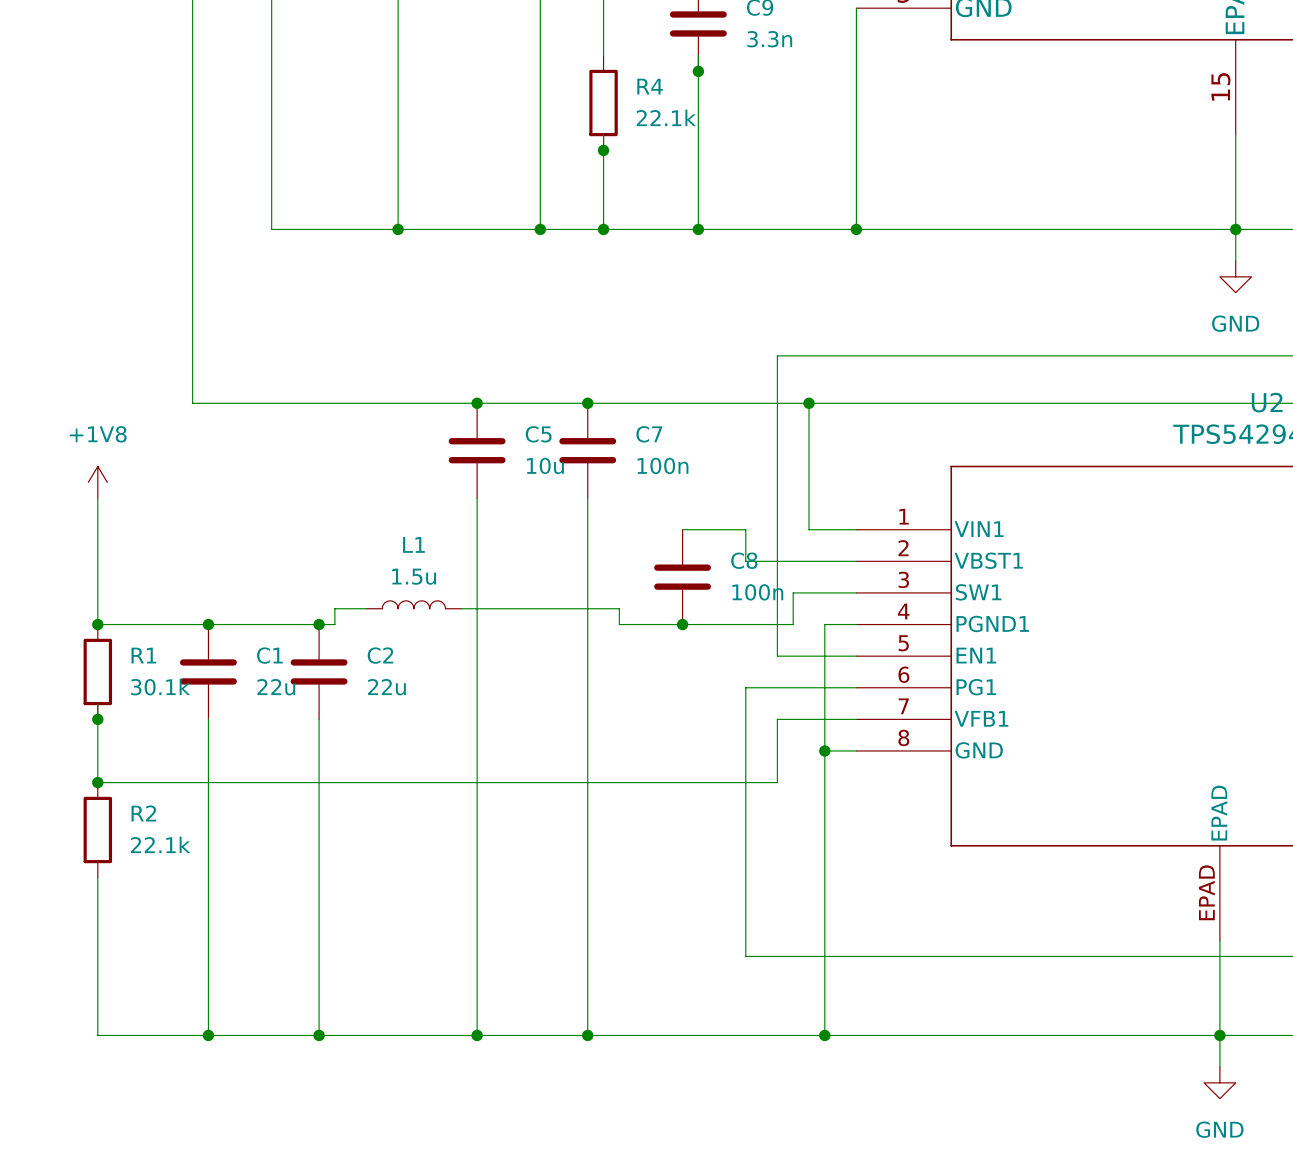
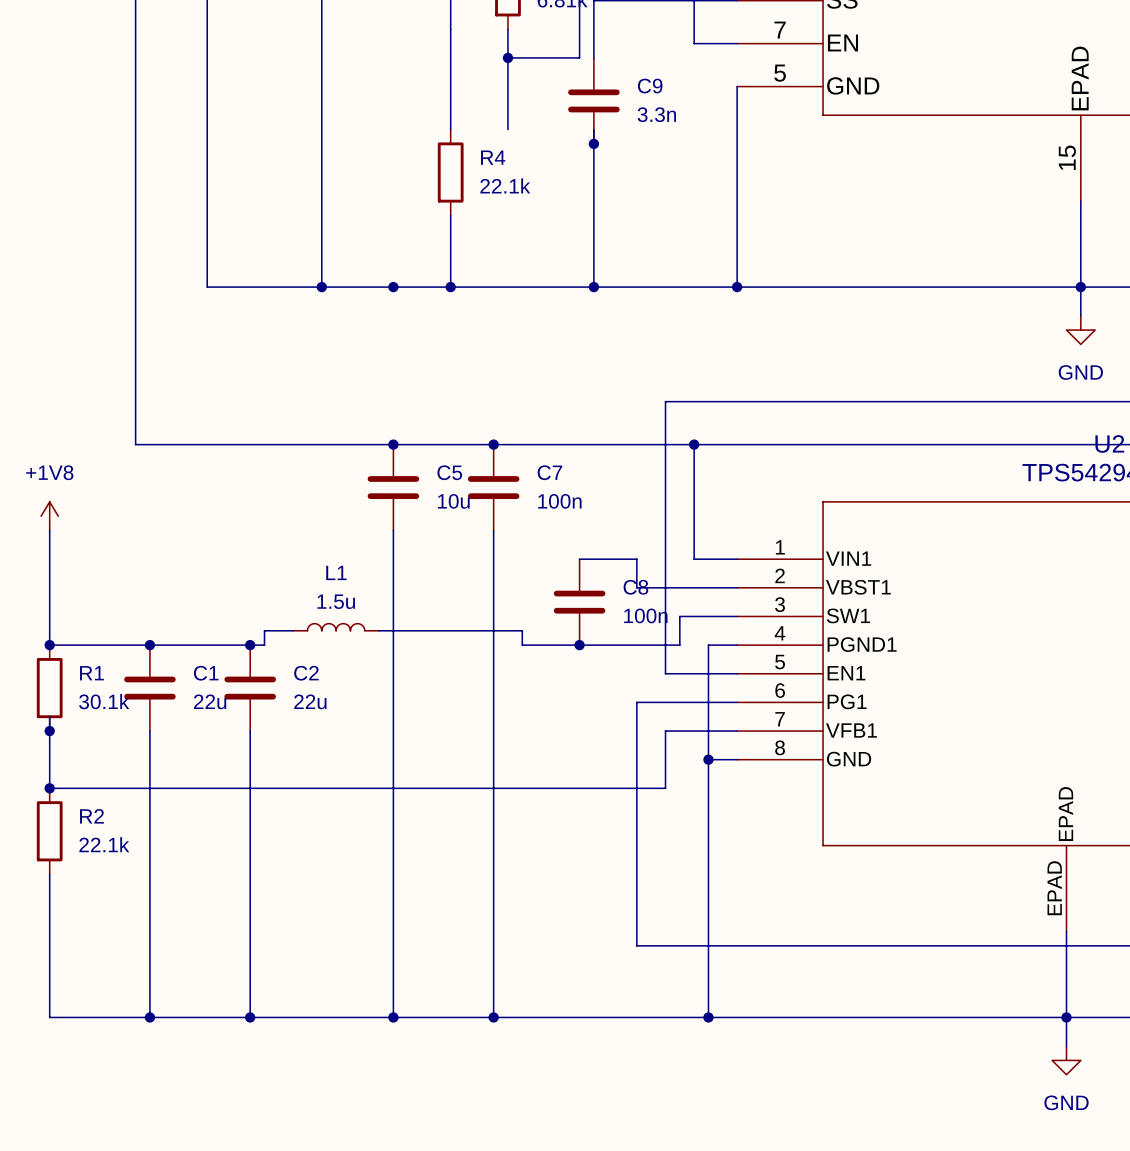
wire: (540, 55) (540, 150) -> none
R4 position: (603, 103) -> (450, 172)
wire: (603, 134) (603, 229) -> none
junction: (603, 150) -> none
junction: none -> (393, 287)
junction: (603, 229) -> none

